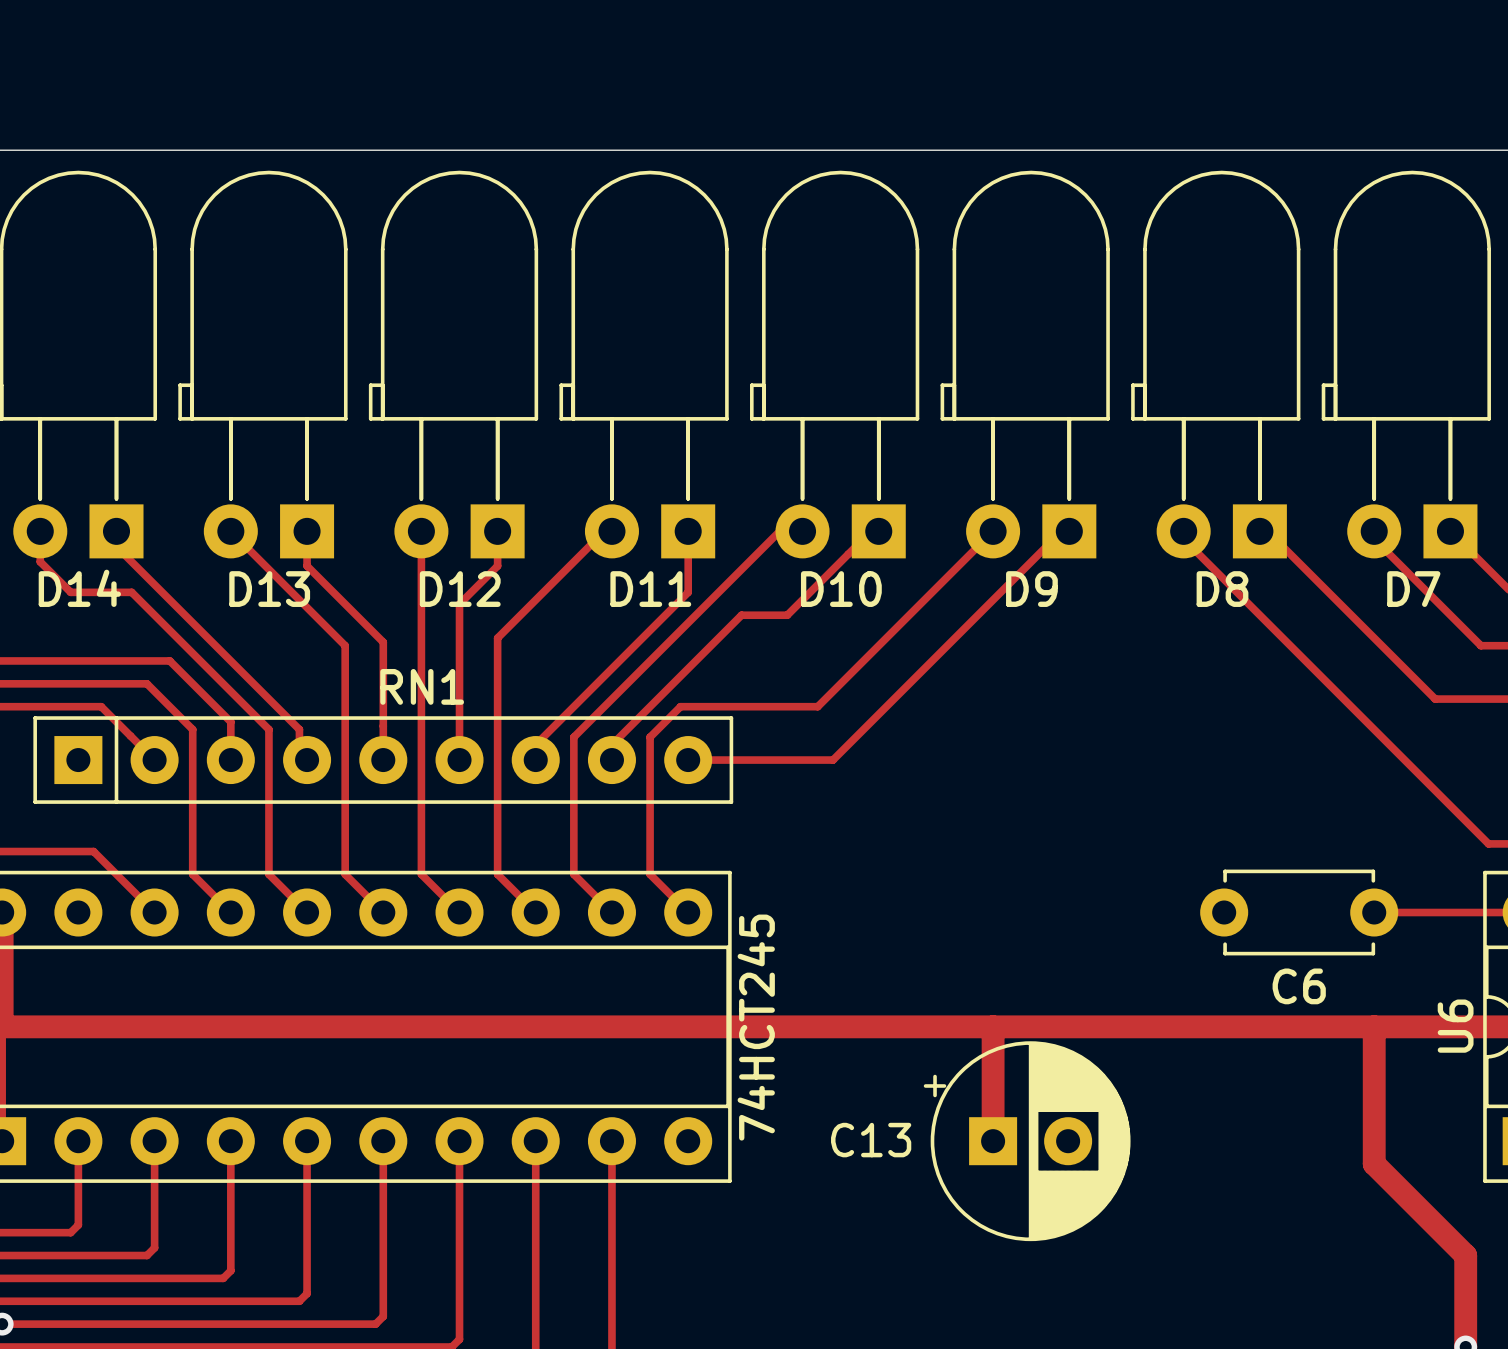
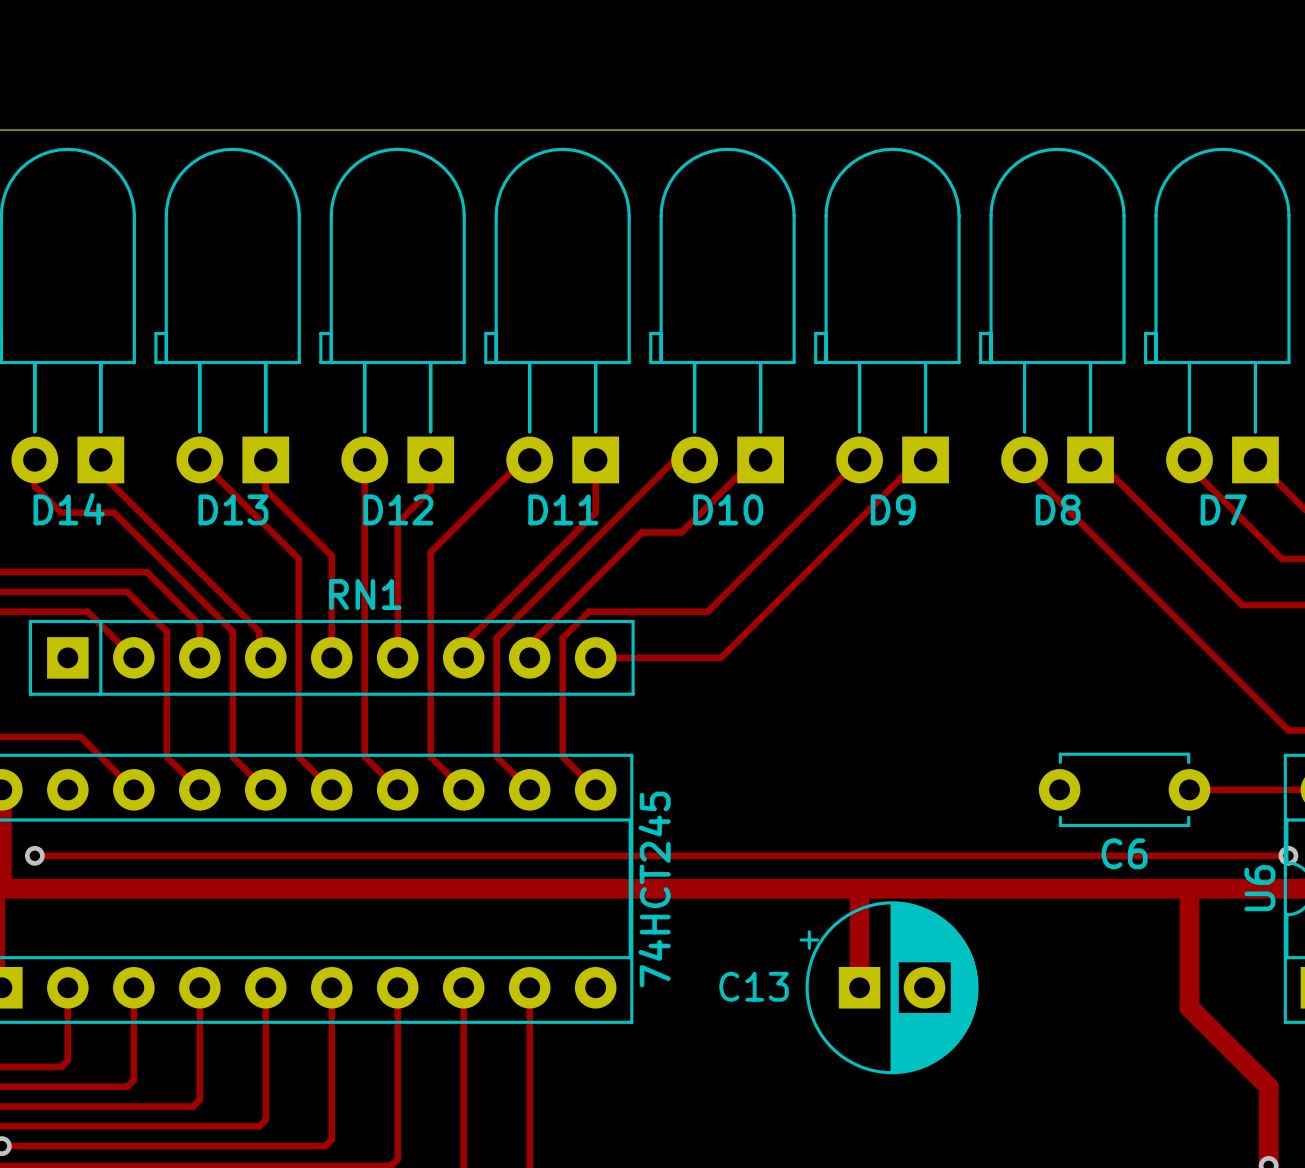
track: none -> (34, 855) (1288, 855)
via: none -> (34, 855)
via: none -> (1288, 855)

